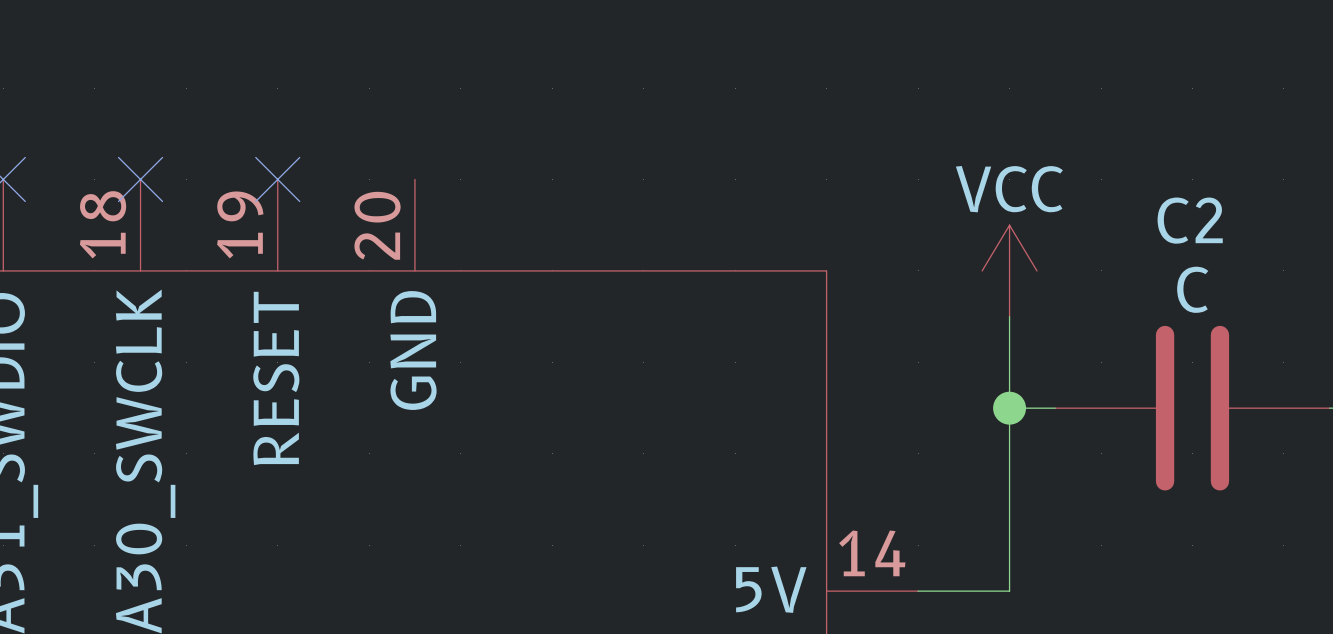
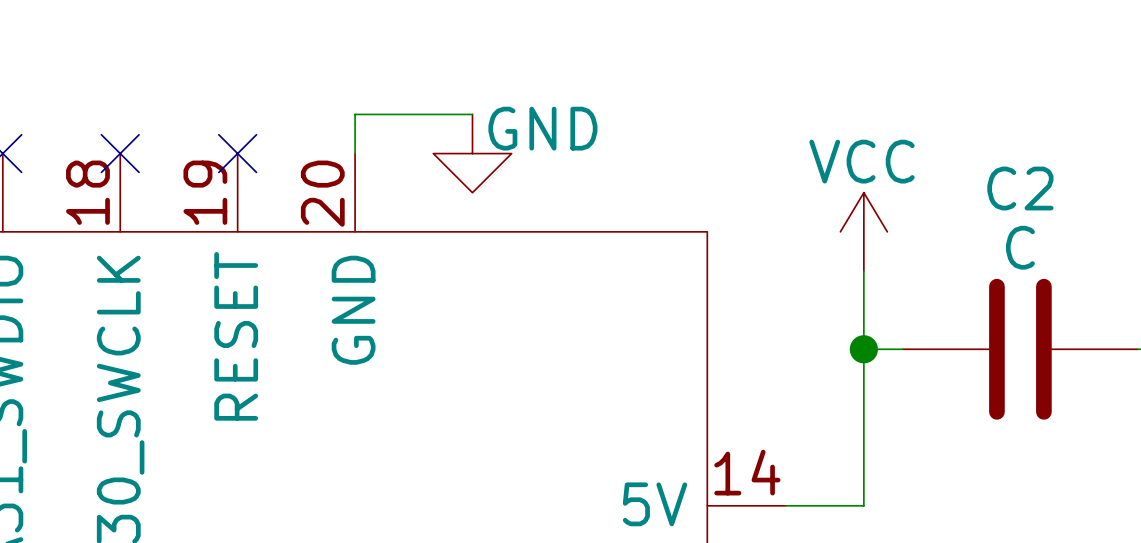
wire: none -> (472, 114) (355, 114) (355, 153)
power symbol: none -> GND (472, 153)

